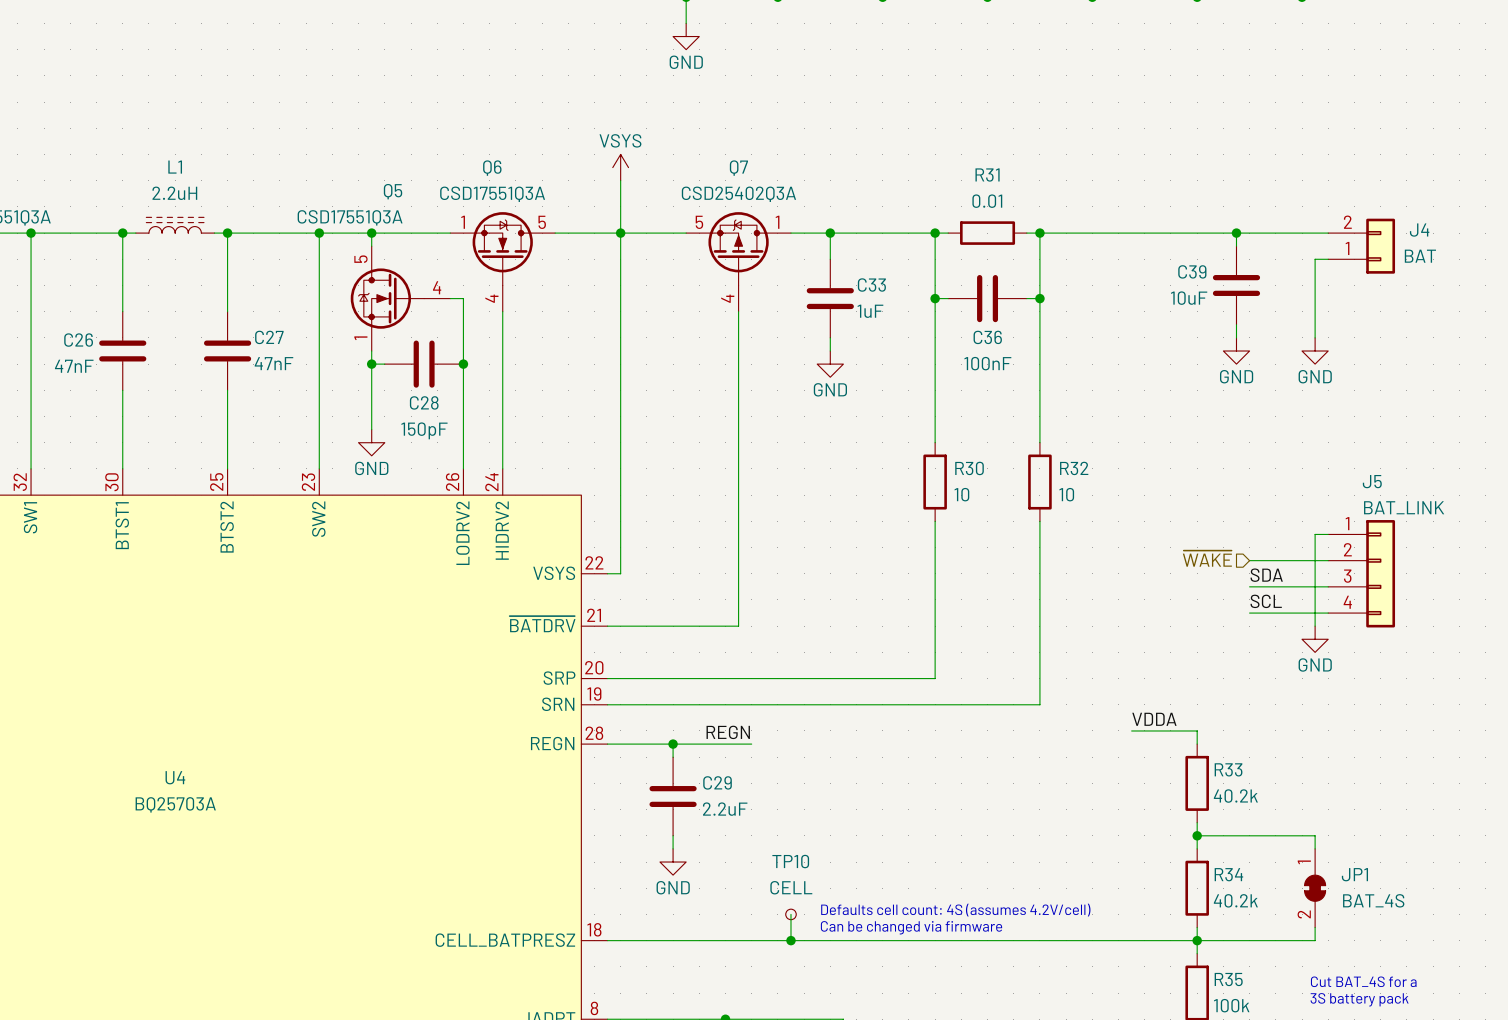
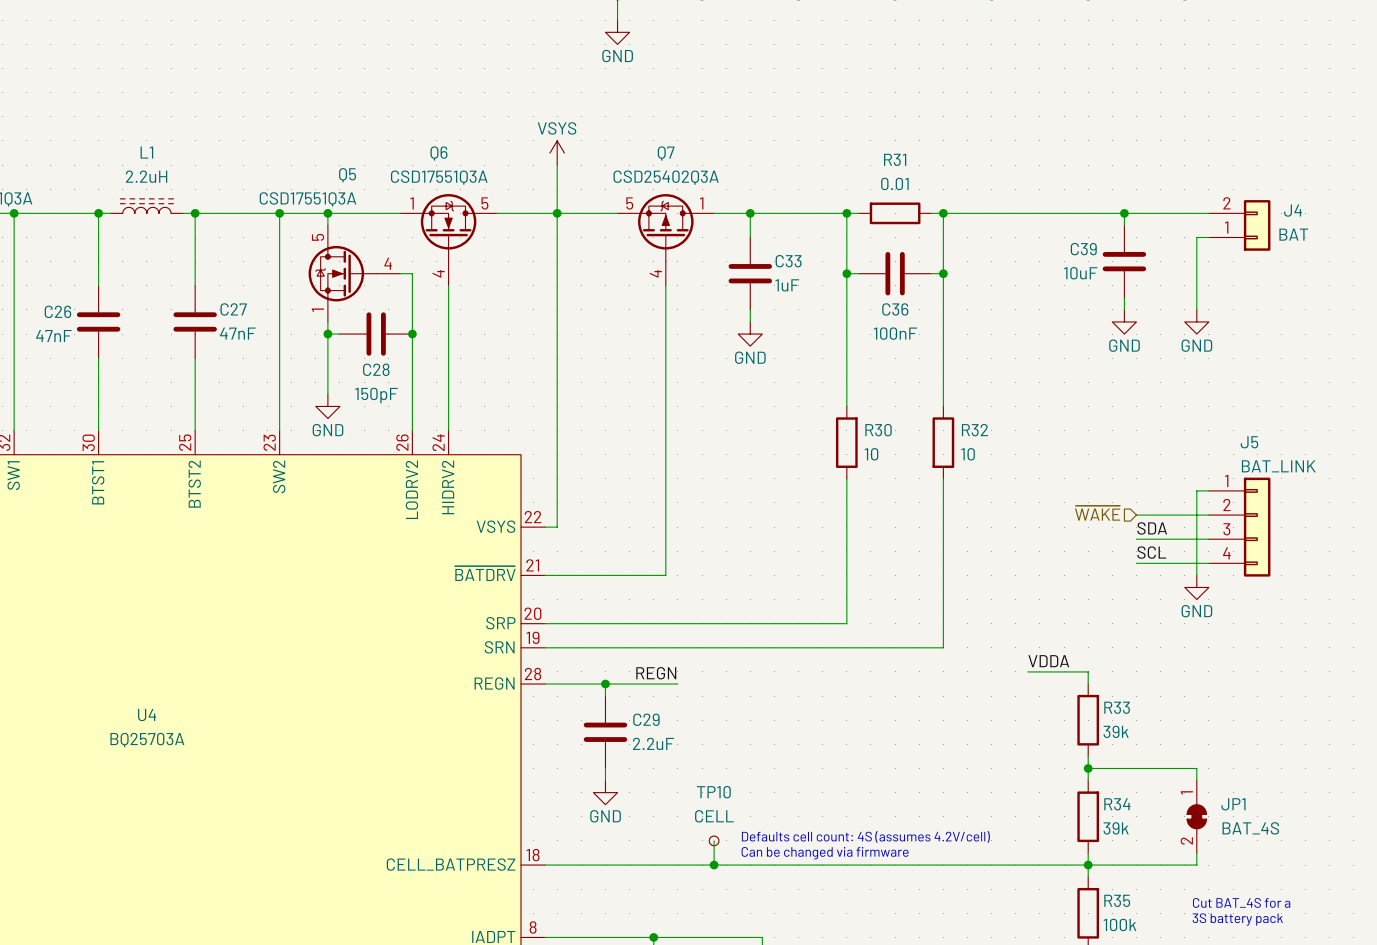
R33 value: 40.2k (1235, 796) -> 39k (1116, 731)
R34 value: 40.2k (1235, 900) -> 39k (1116, 828)

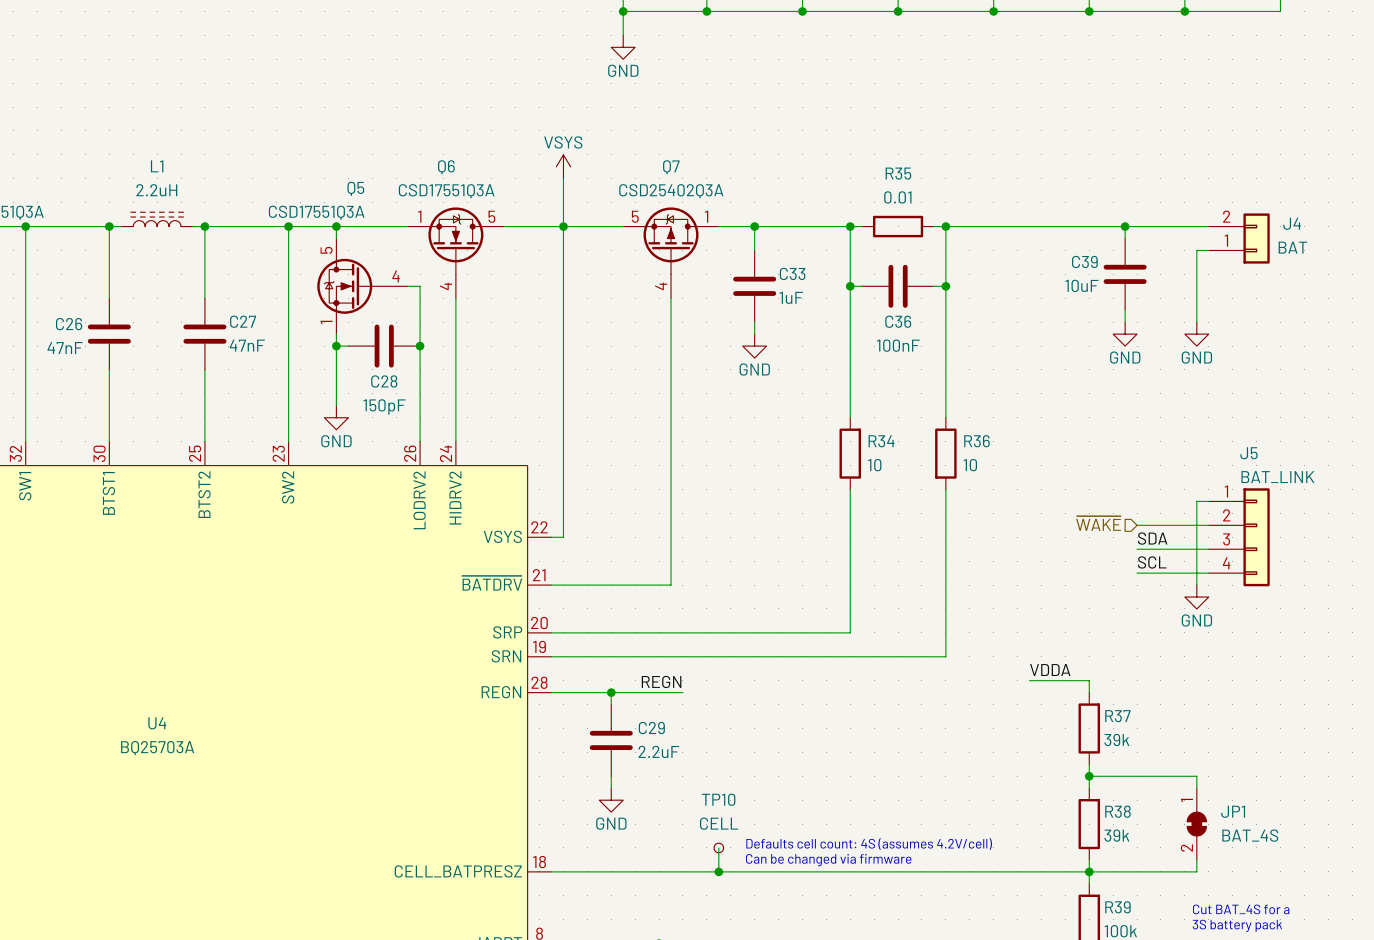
R31 name: R31 (895, 159) -> R35 (898, 173)
R30 name: R30 (878, 430) -> R34 (881, 441)
R32 name: R32 (974, 430) -> R36 (976, 441)
R33 name: R33 (1117, 707) -> R37 (1117, 716)
R34 name: R34 (1117, 804) -> R38 (1117, 811)
R35 name: R35 (1117, 900) -> R39 (1117, 907)

